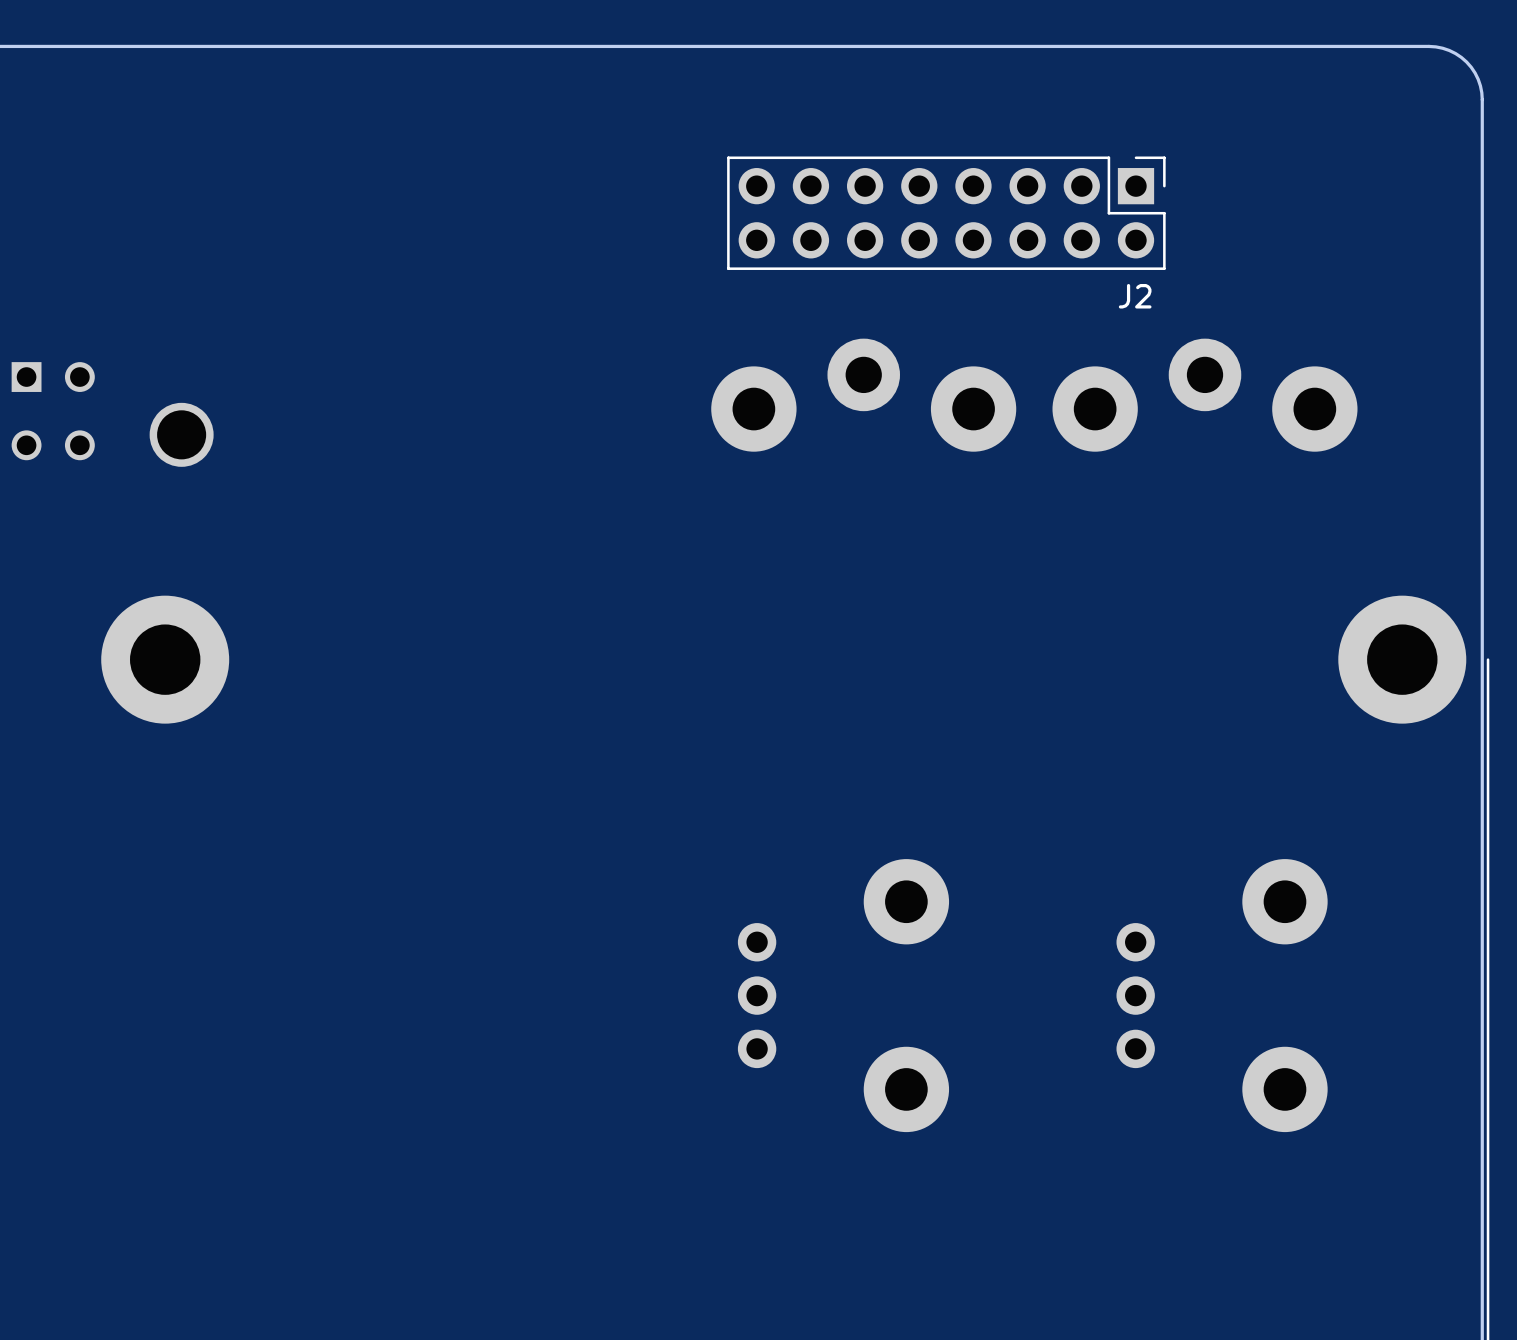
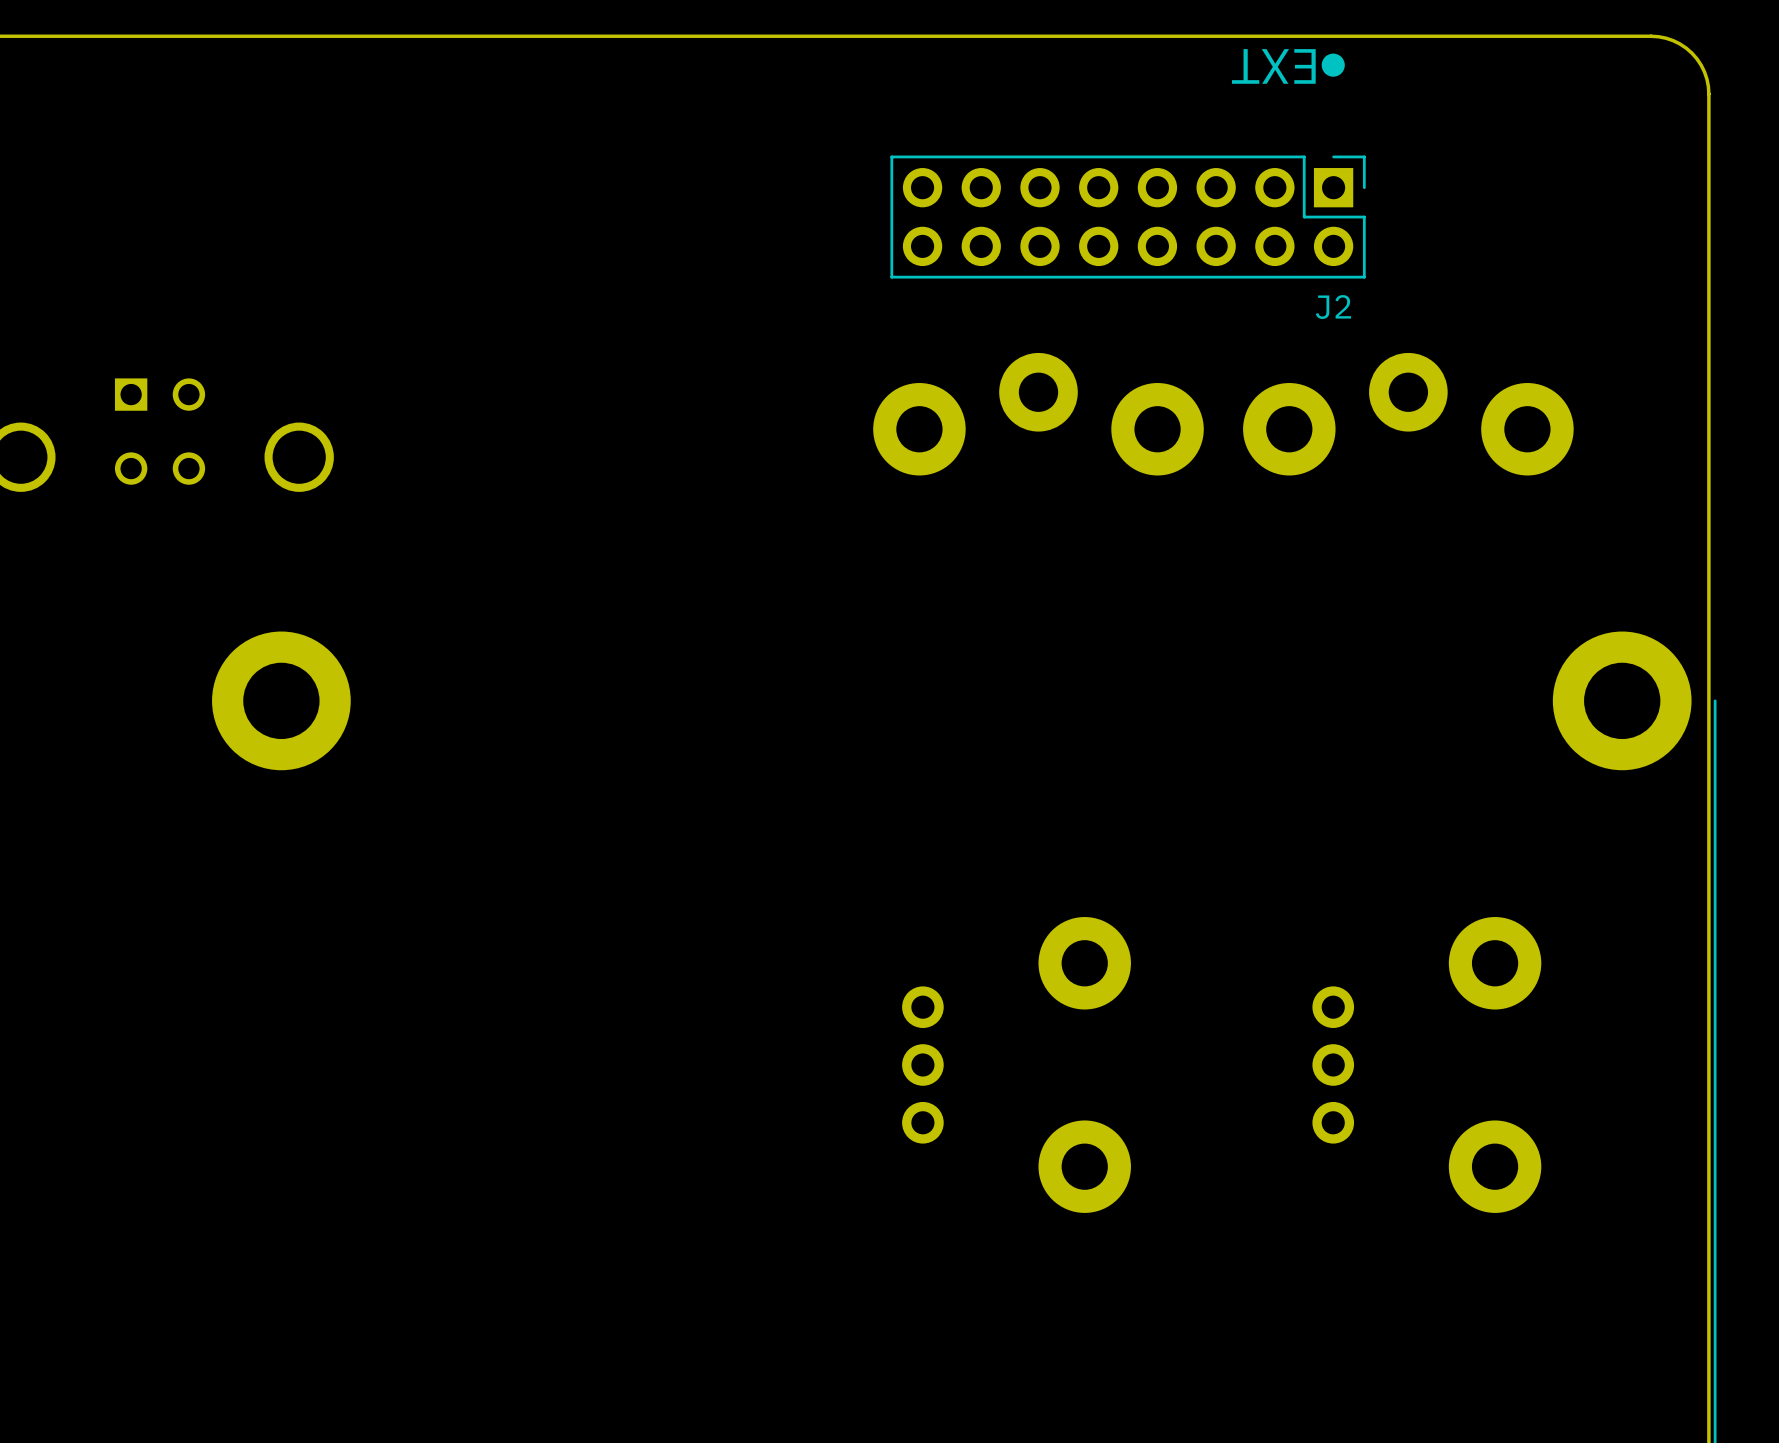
drawing: none -> [1321, 53, 1345, 77]
text: none -> EXT (1273, 66)

